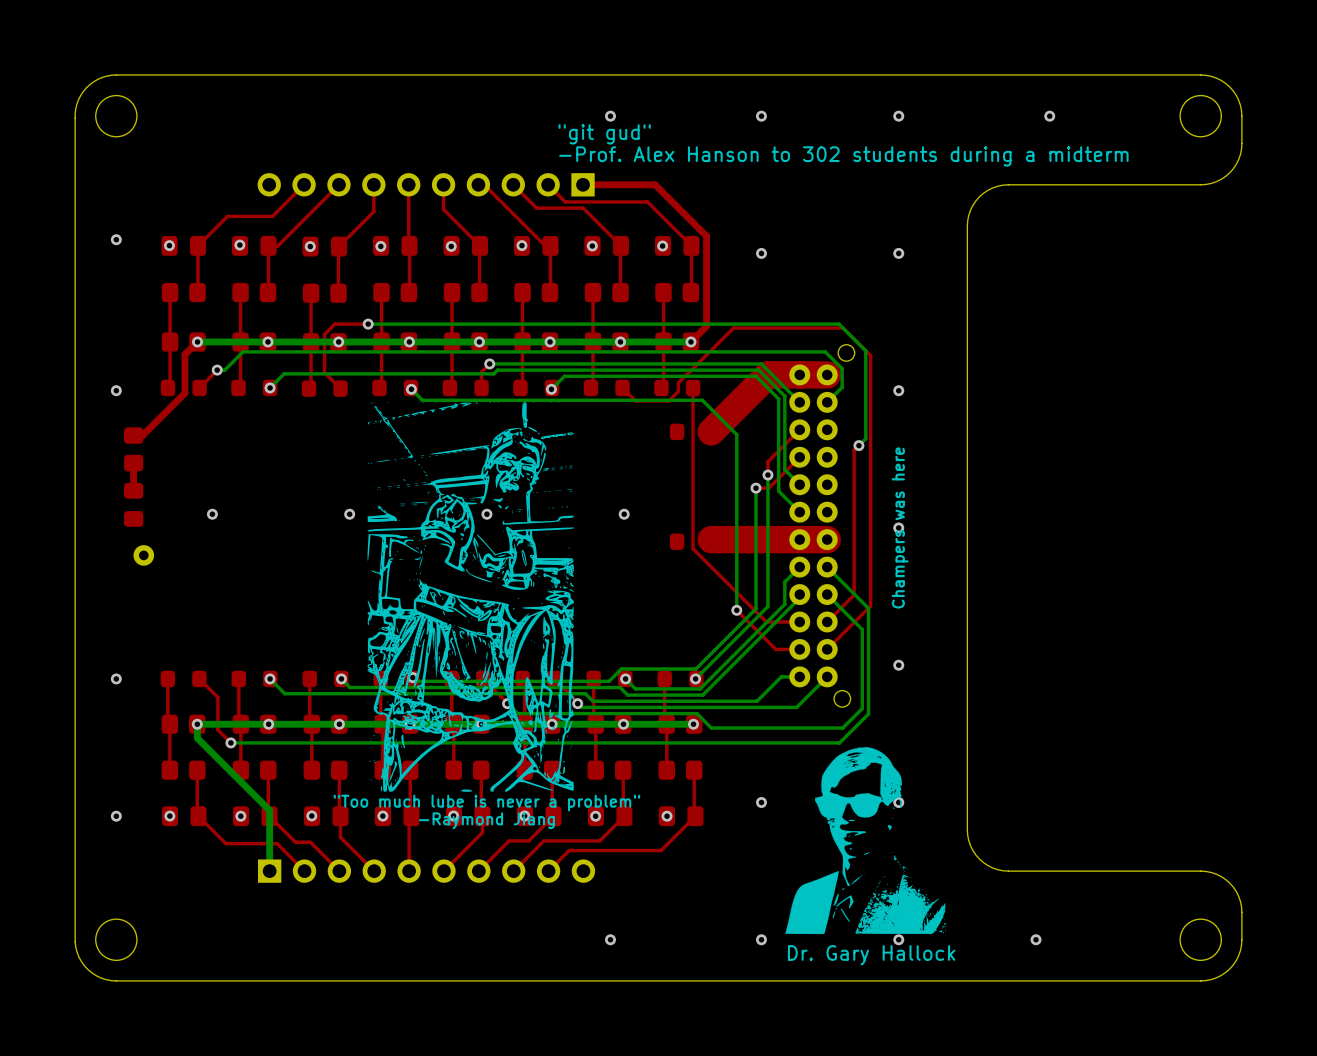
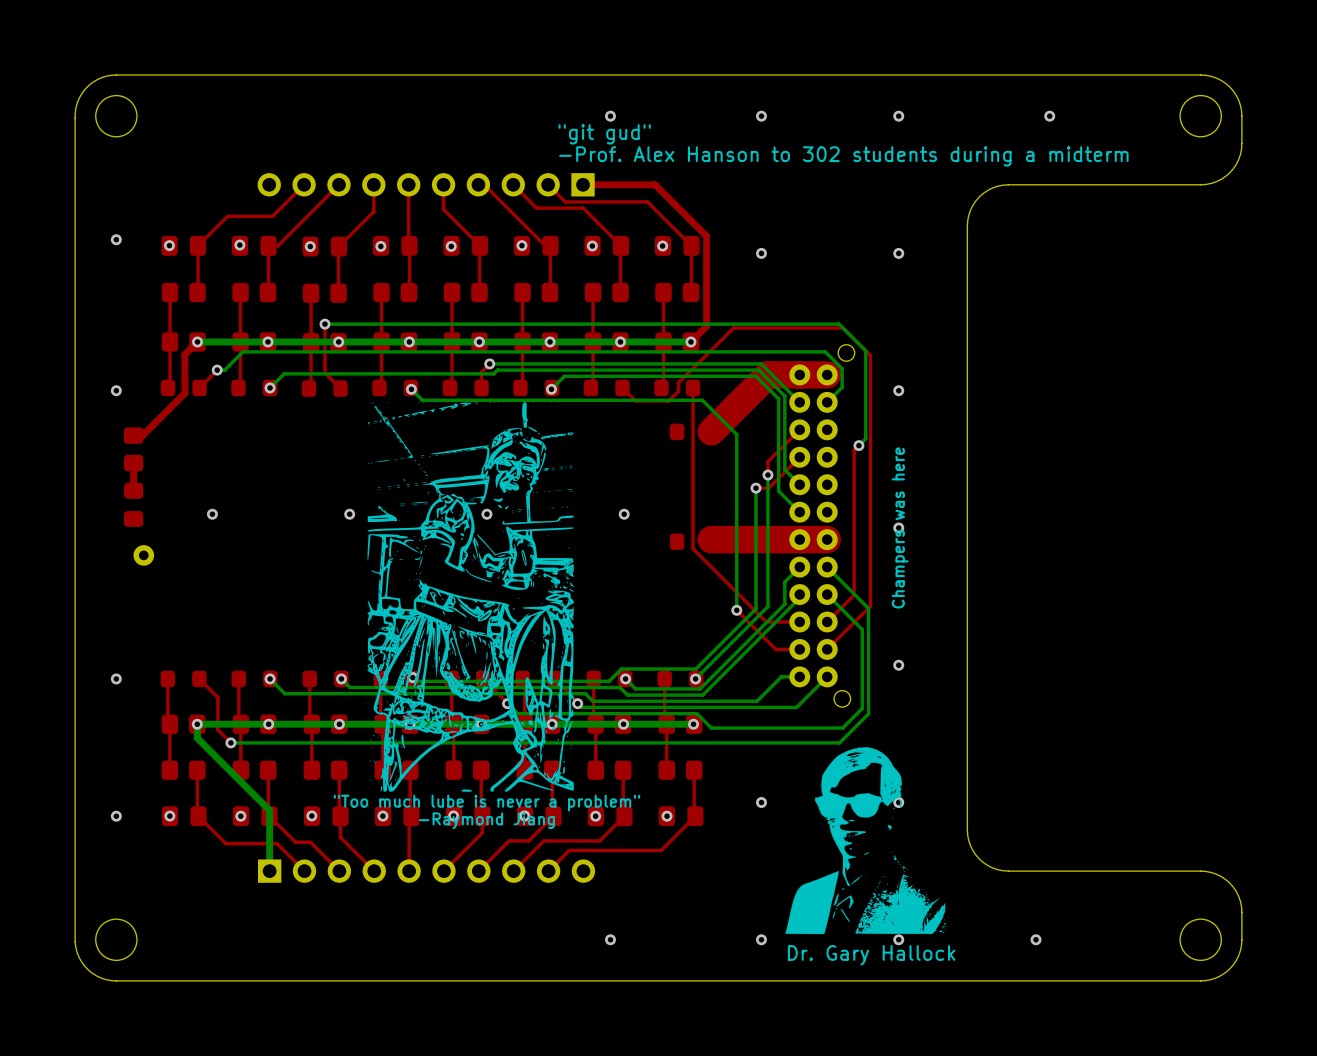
top track: (368, 324) (334, 324) (324, 334) (324, 373) -> (324, 324) (324, 373)
bottom track: none -> (368, 324) (324, 324)
via position: (368, 324) -> (324, 324)

